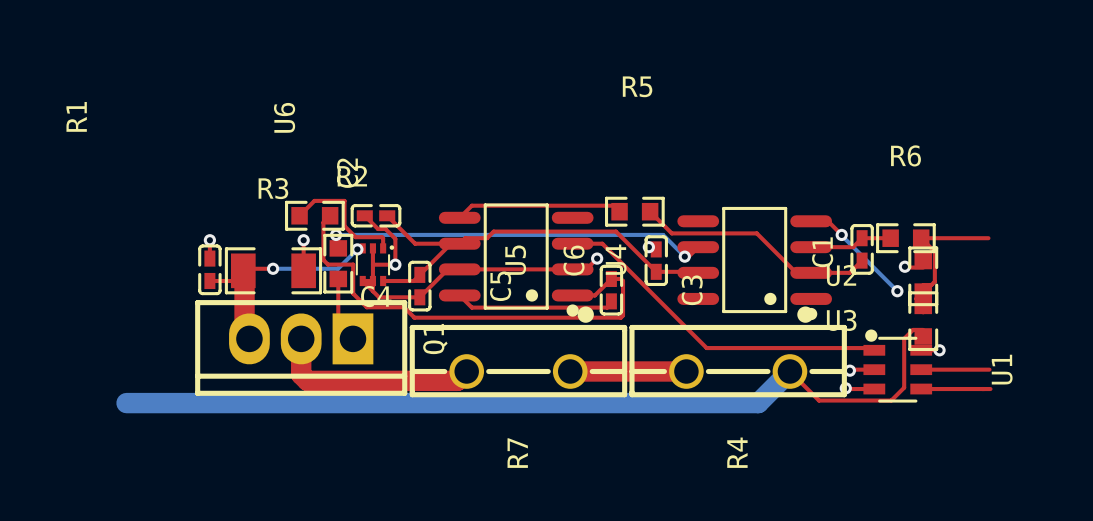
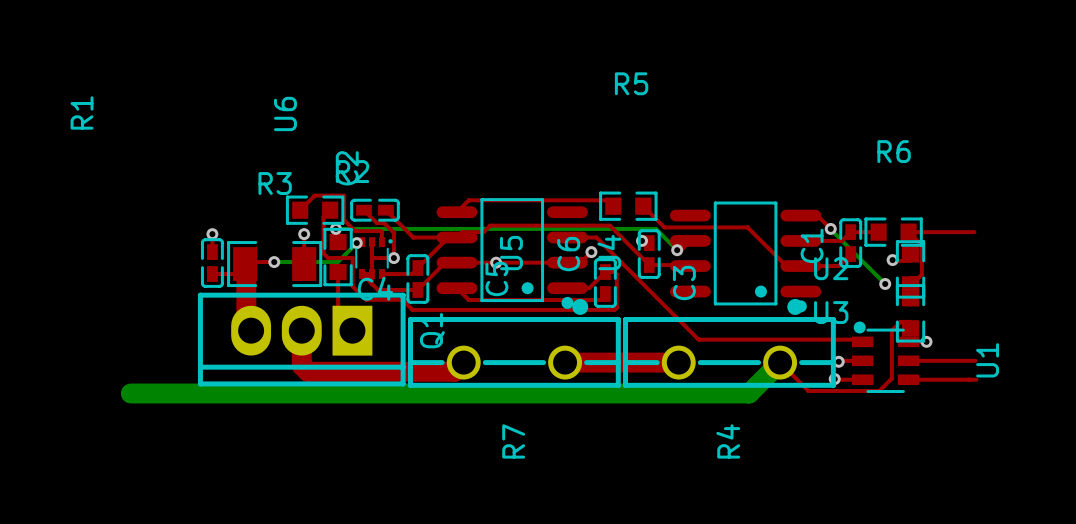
via: none -> (496, 262)

